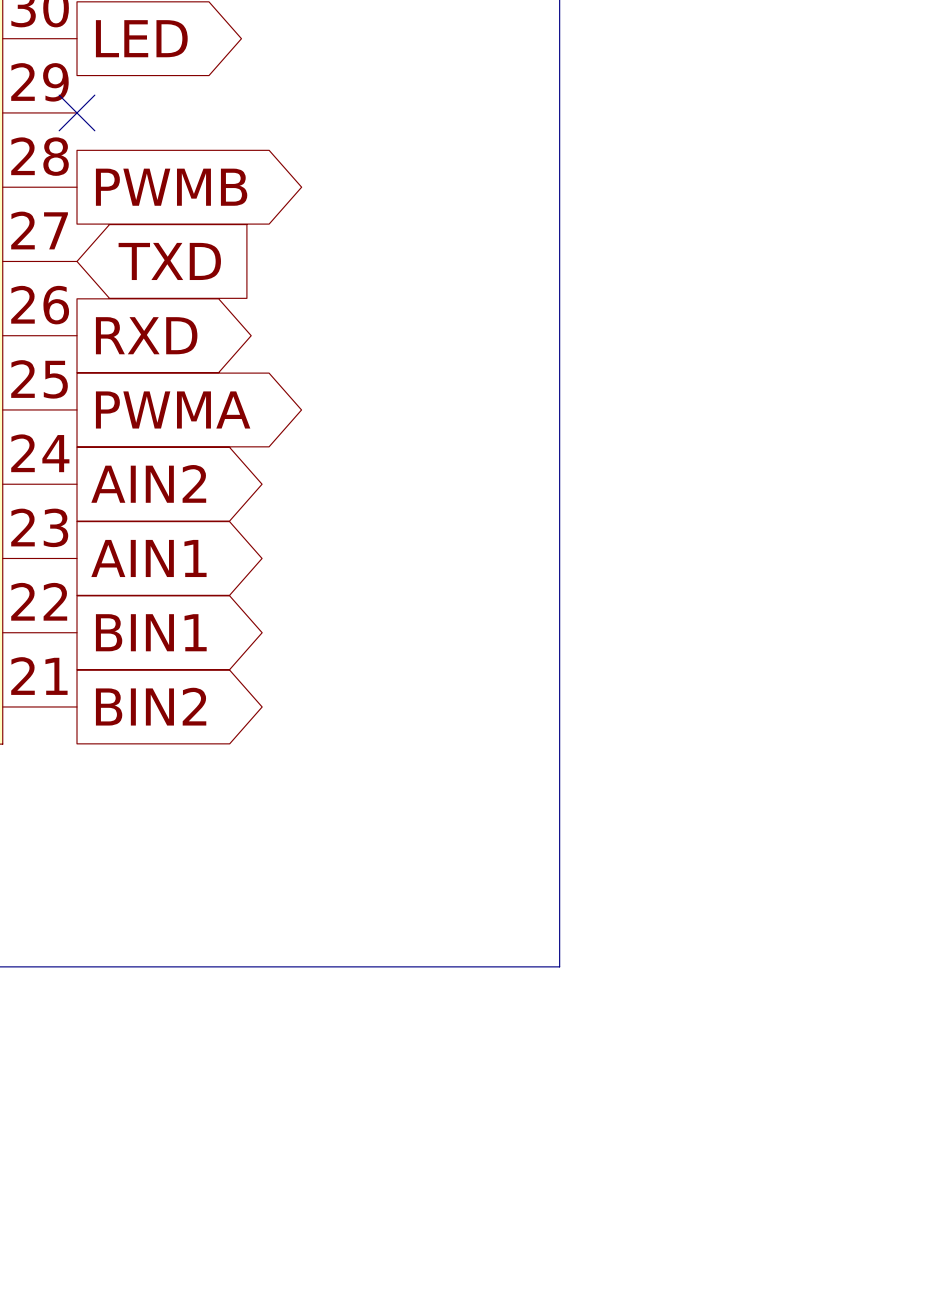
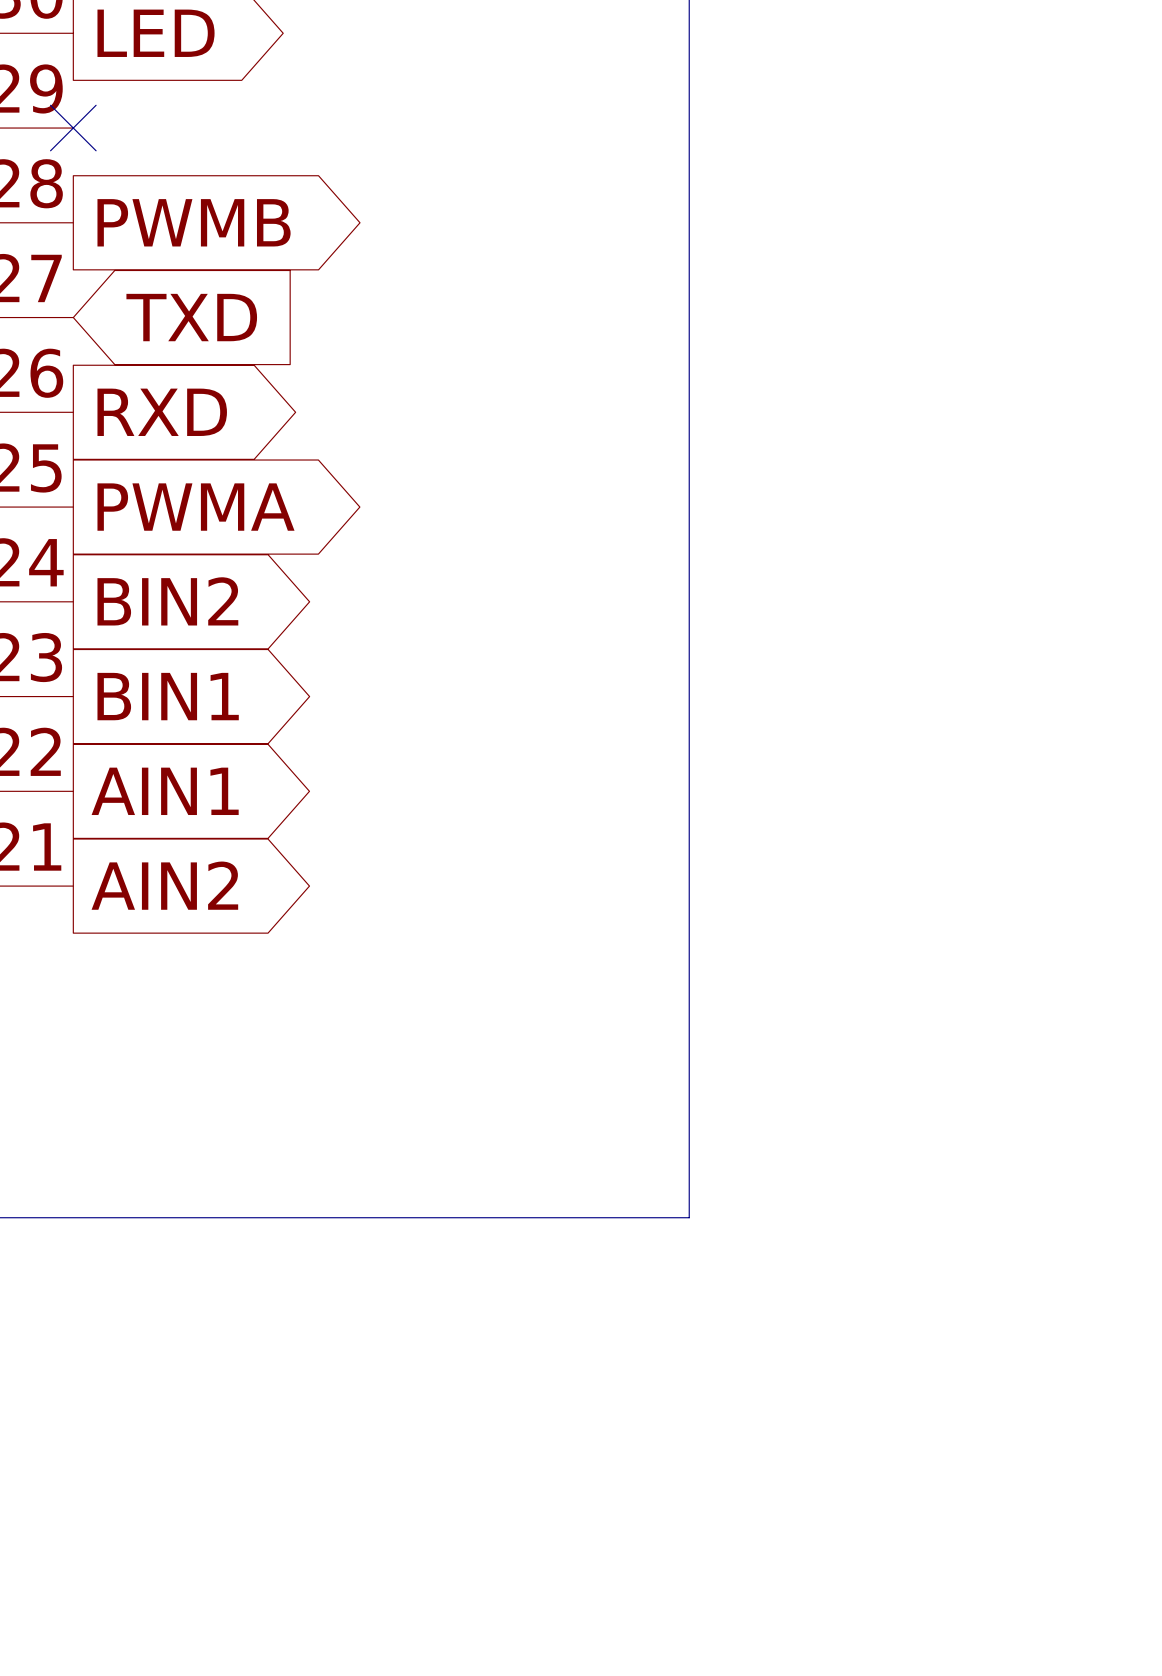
global label: AIN2 (148, 483) -> BIN2 (167, 601)
global label: AIN1 (148, 558) -> BIN1 (168, 696)
global label: BIN1 (151, 632) -> AIN1 (165, 791)
global label: BIN2 (151, 706) -> AIN2 (164, 885)

